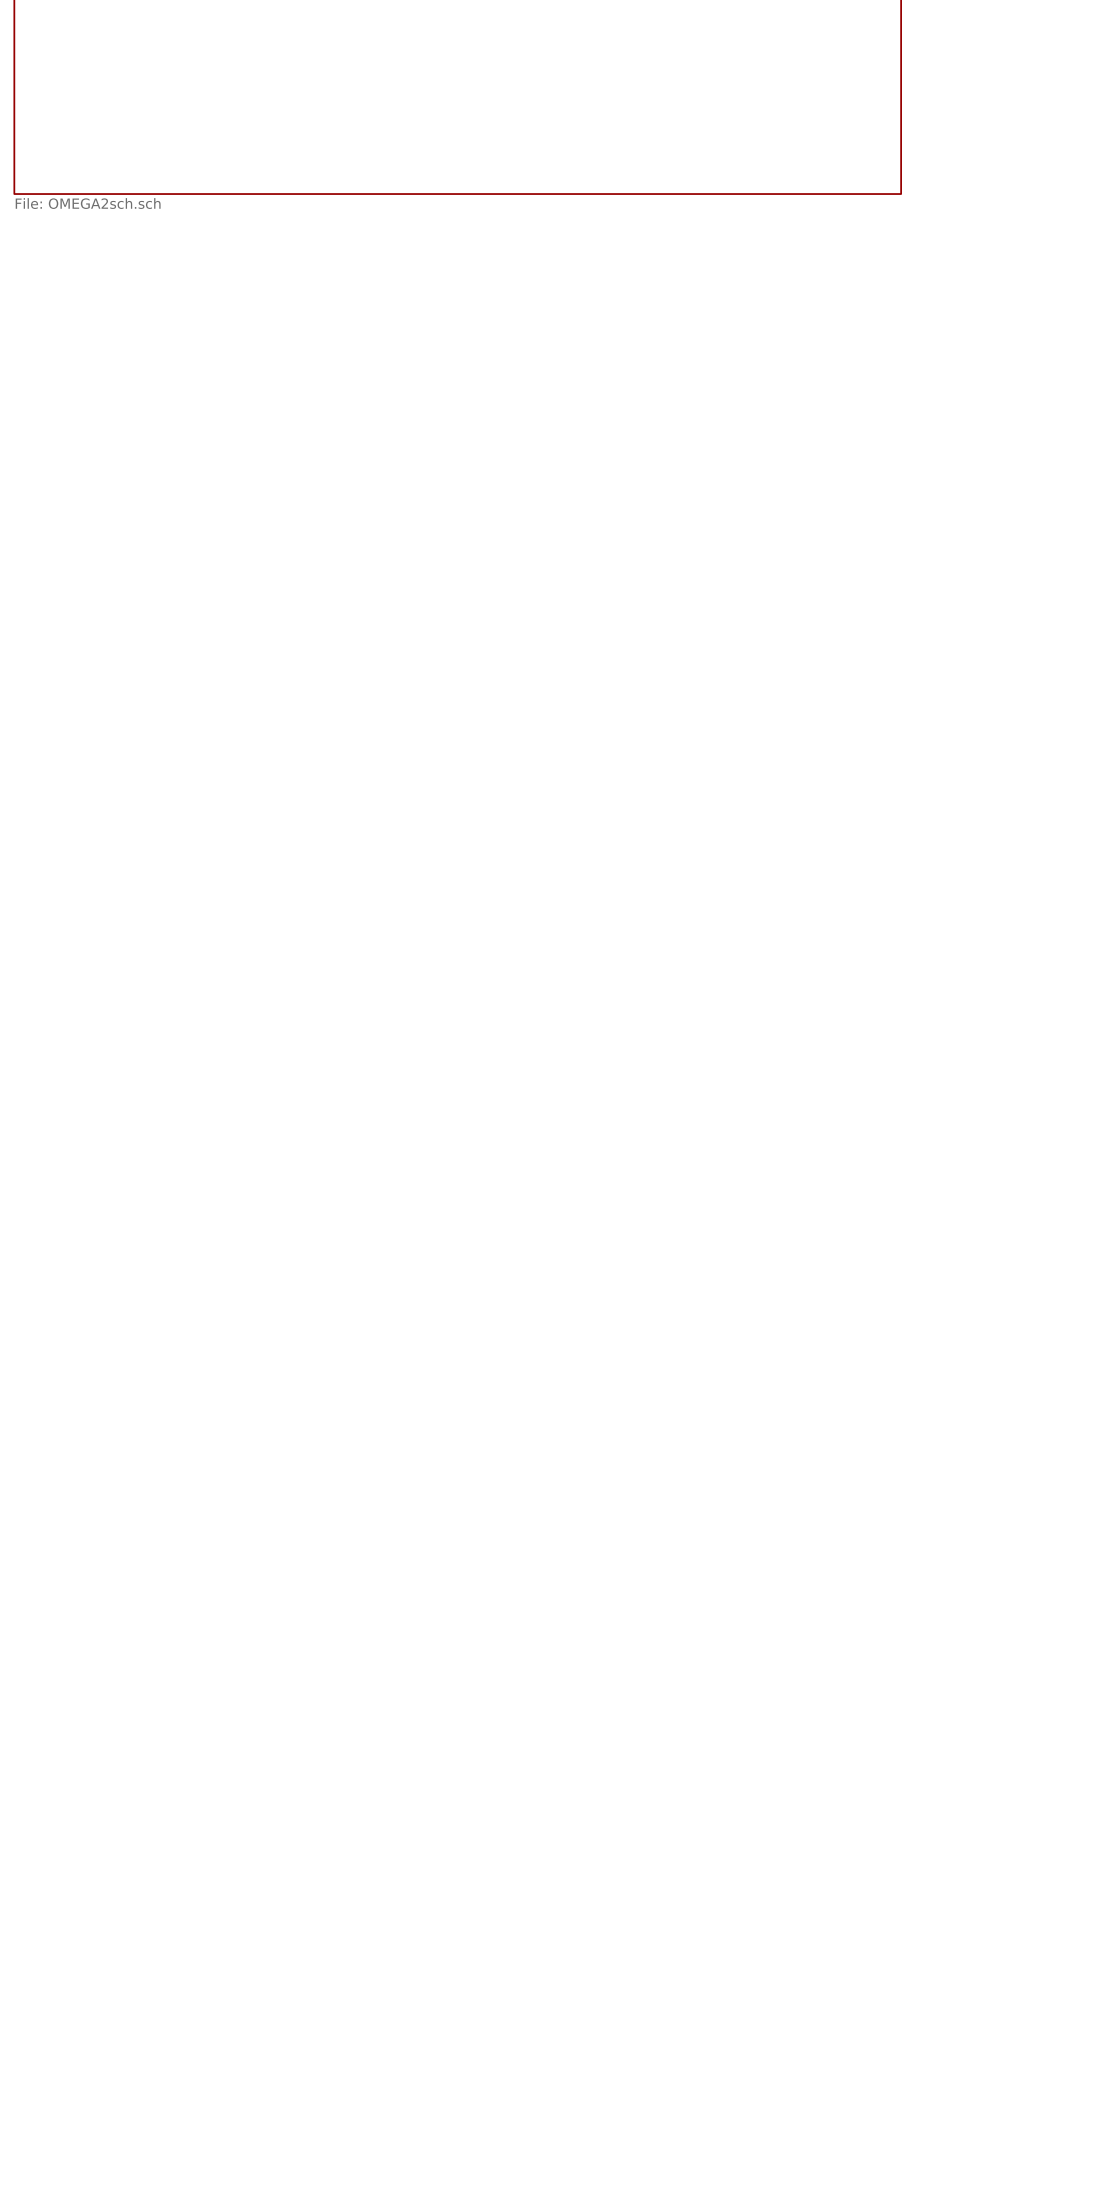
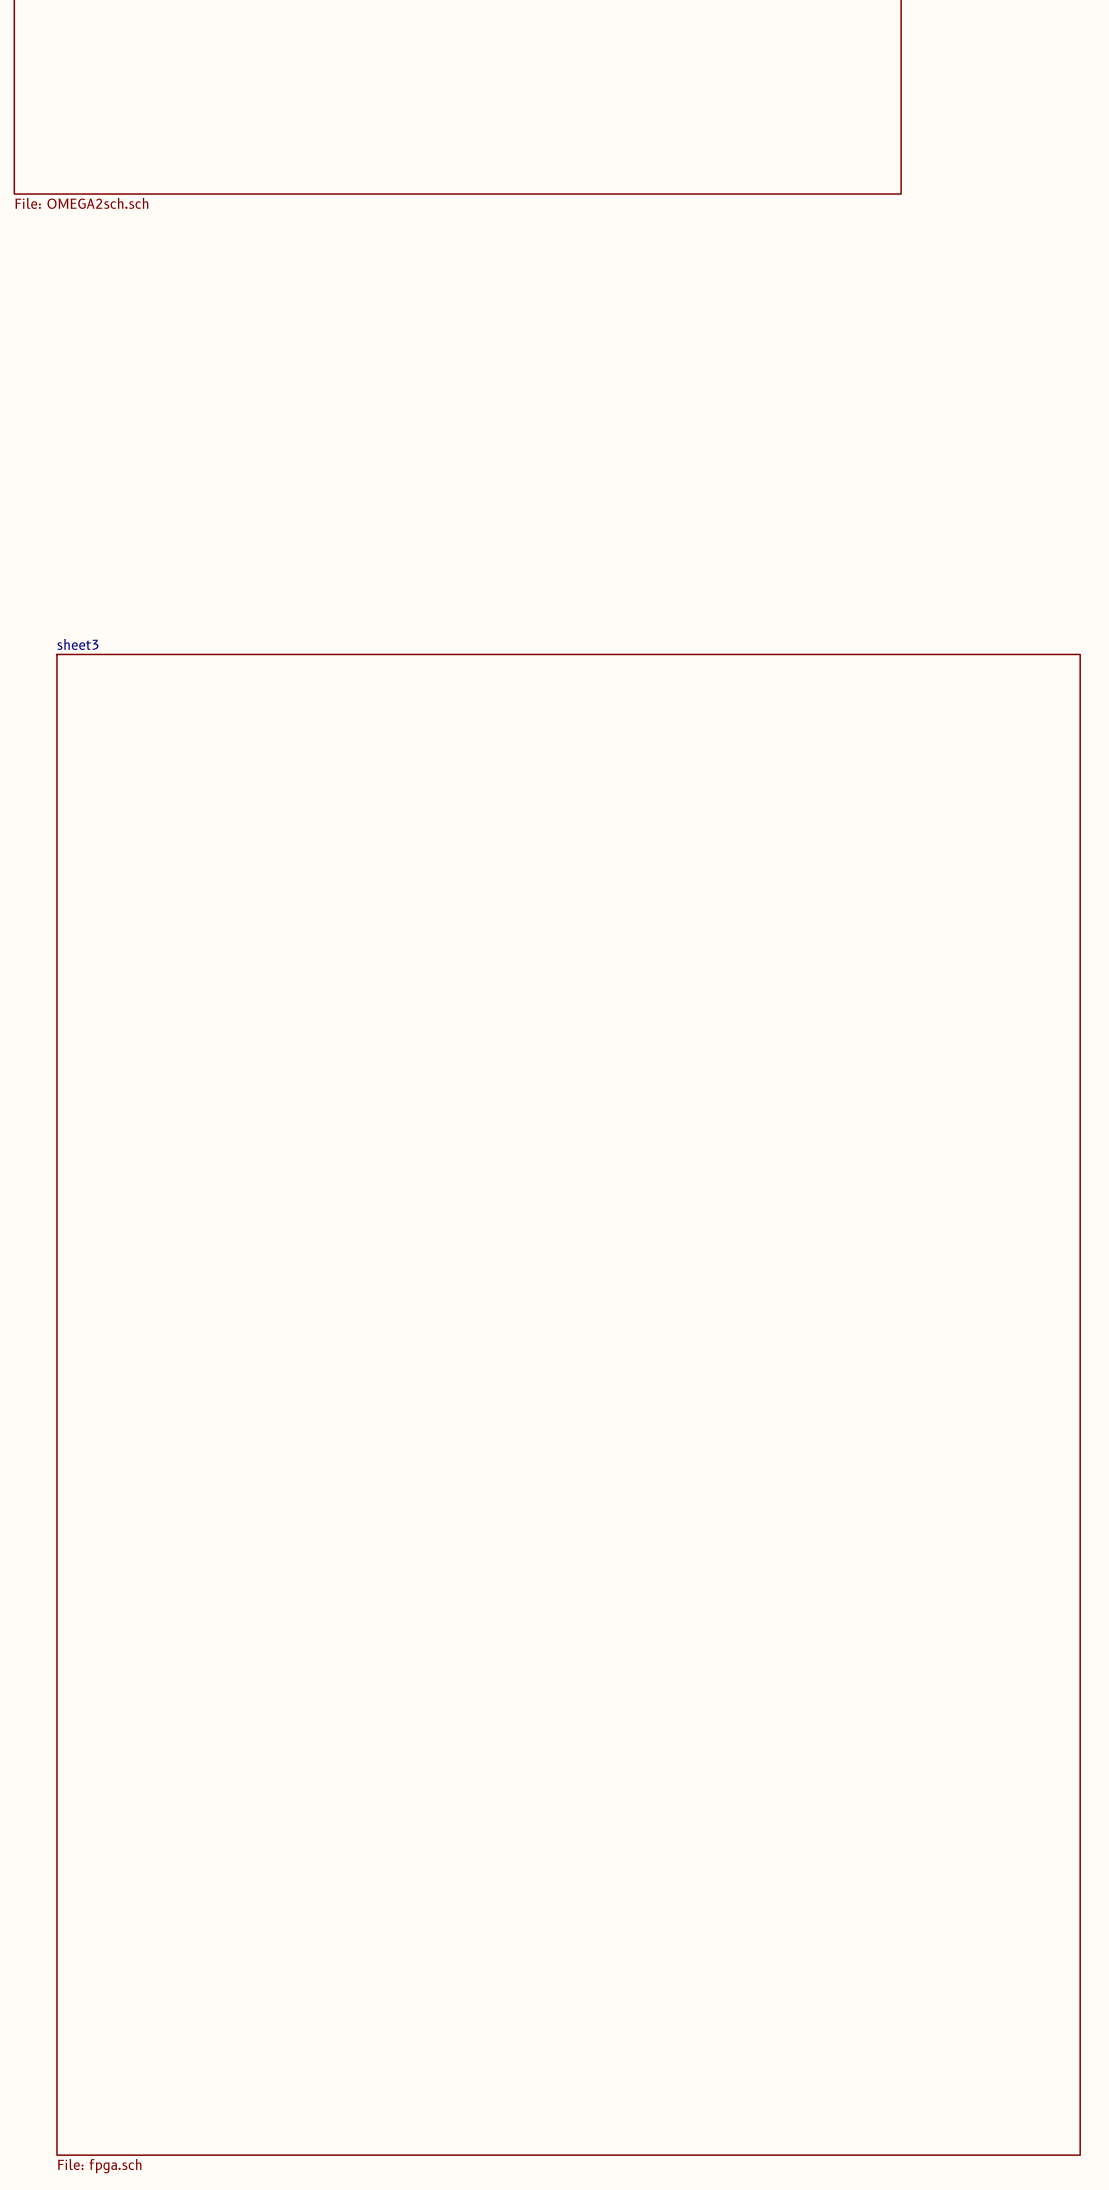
sheet sheet3: none -> File: fpga.sch (568, 1404)

